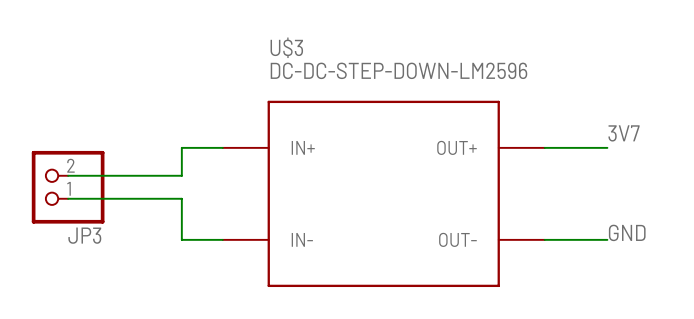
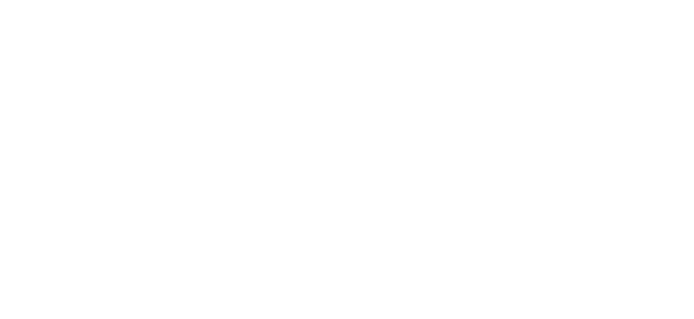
label: 3V7 (624, 133) -> none
wire: (222, 147) (181, 147) (181, 175) (68, 175) -> none
wire: (544, 147) (607, 147) -> none
JP3: (68, 187) -> none
U$3: DC-DC-STEP-DOWN-LM2596 (383, 193) -> none
wire: (68, 198) (181, 198) (181, 239) (222, 239) -> none
label: GND (627, 232) -> none
wire: (544, 239) (607, 239) -> none

